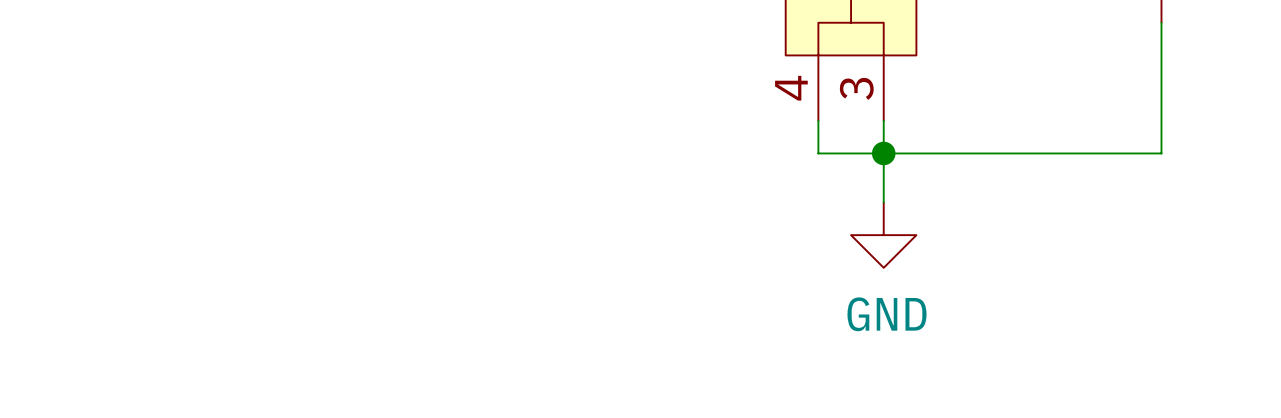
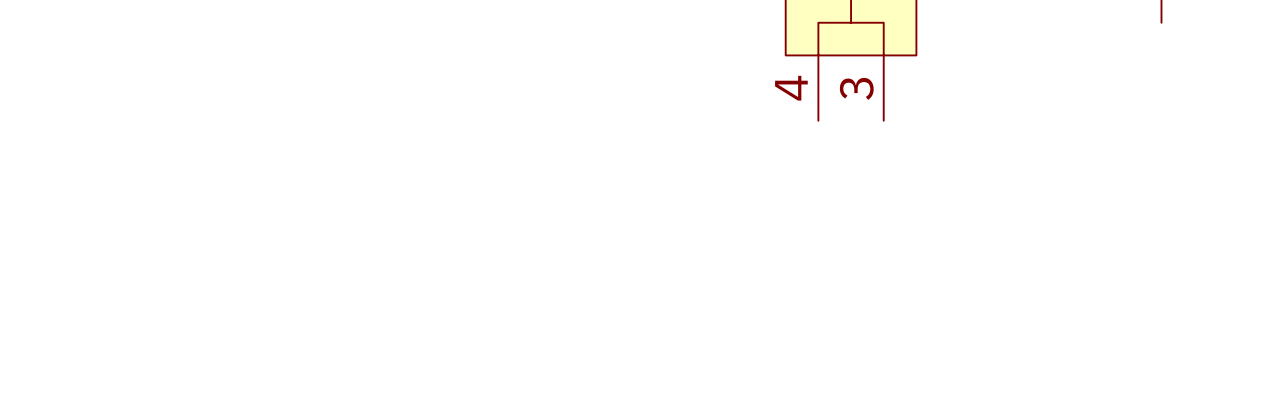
wire: (1161, 22) (1161, 153) (818, 153) (818, 120) -> none
wire: (883, 120) (883, 202) -> none
junction: (883, 153) -> none
power symbol: GND (883, 235) -> none

